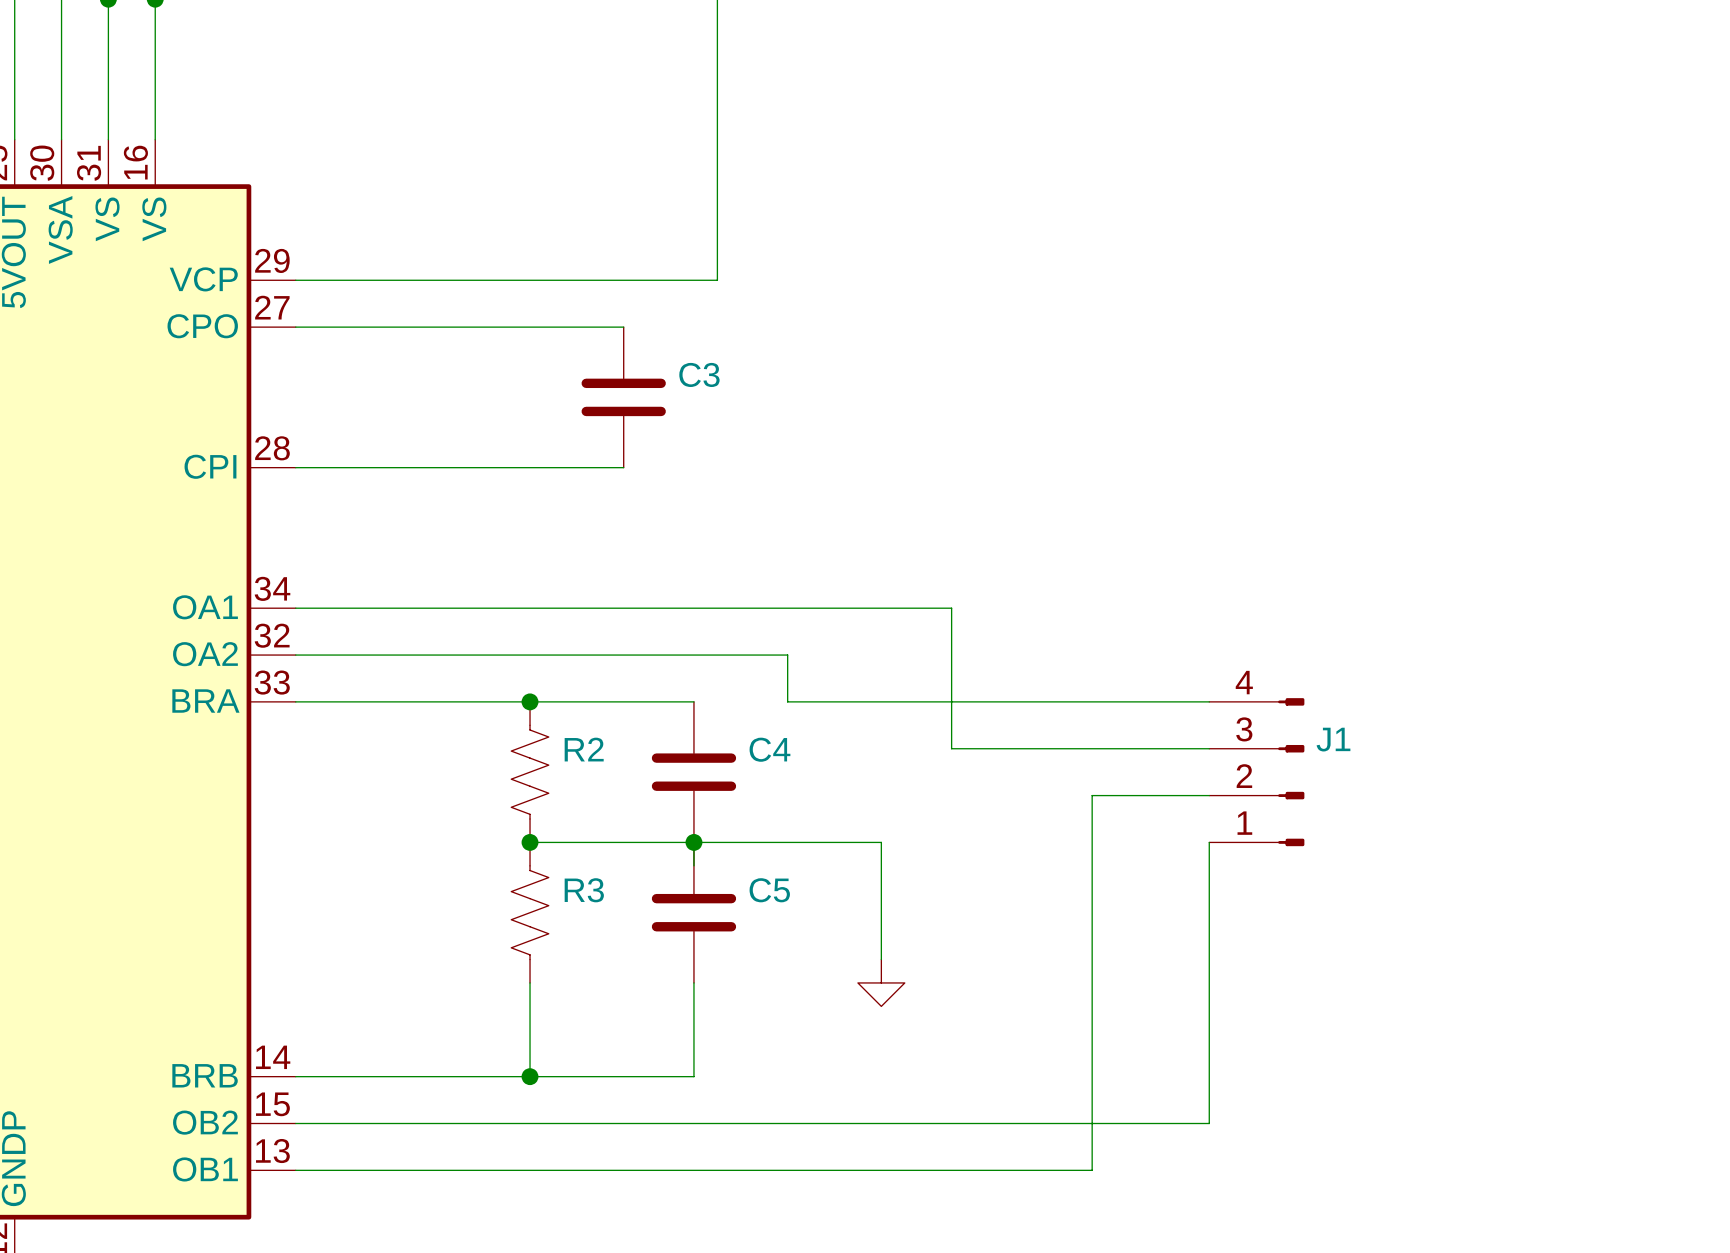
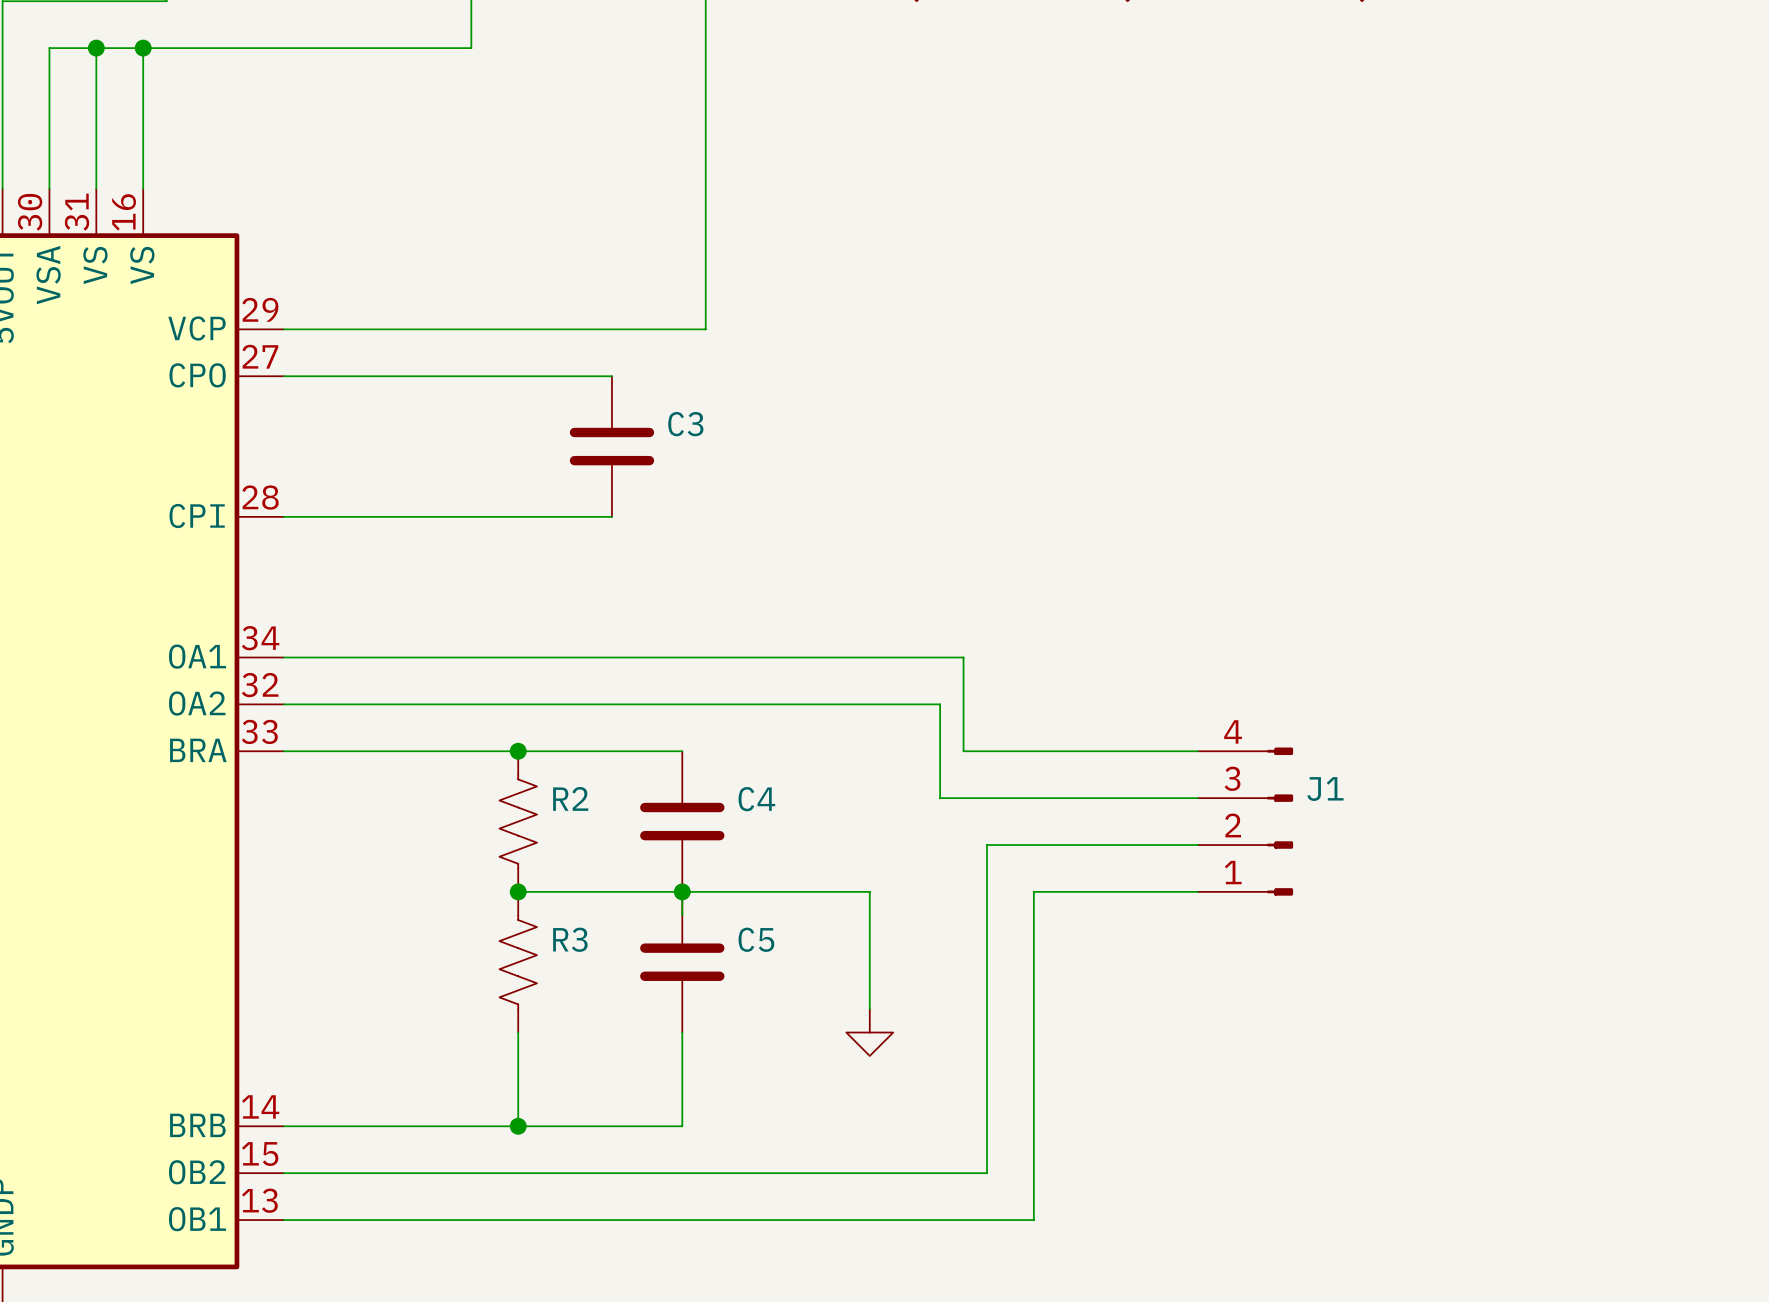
wire: (951, 608) (951, 655) -> (940, 657) (963, 657) (963, 751)
wire: (787, 655) (787, 701) (975, 701) -> (776, 704) (940, 704)
wire: (1092, 795) (1092, 1170) (1045, 1170) -> (1080, 845) (986, 845) (986, 1173)
wire: (1209, 842) (1209, 1123) (998, 1123) -> (1197, 891) (1033, 891) (1033, 1220)

